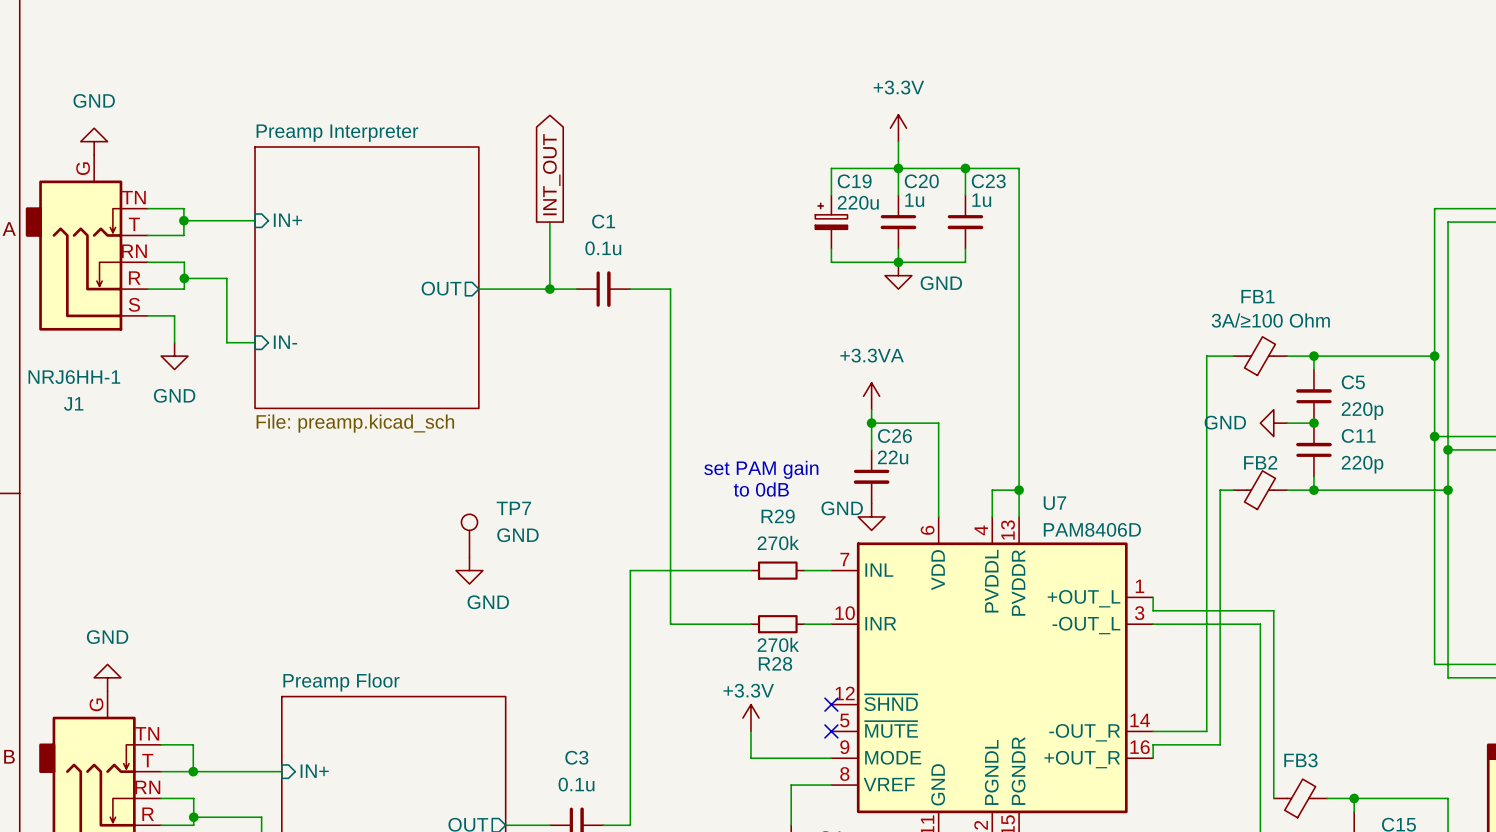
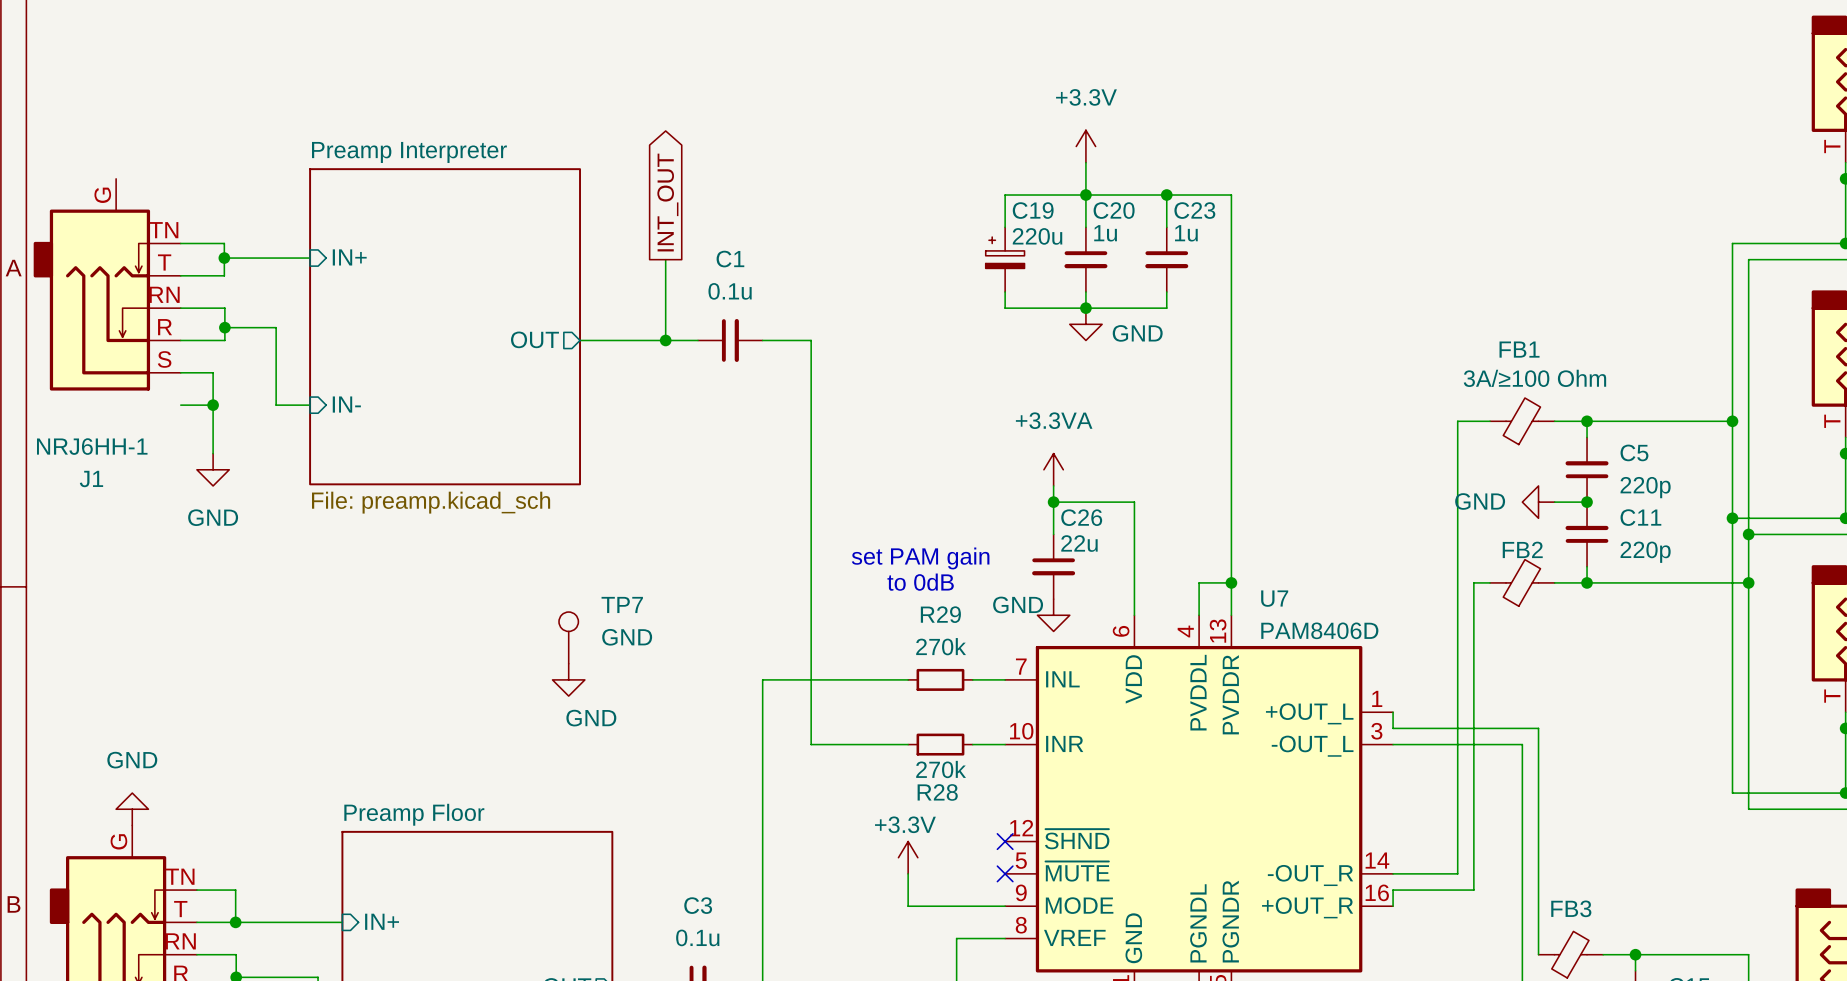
power symbol: GND (94, 141) -> none
wire: none -> (180, 405) (213, 405) (213, 453)
junction: none -> (213, 405)
power symbol position: GND (174, 356) -> GND (213, 469)

